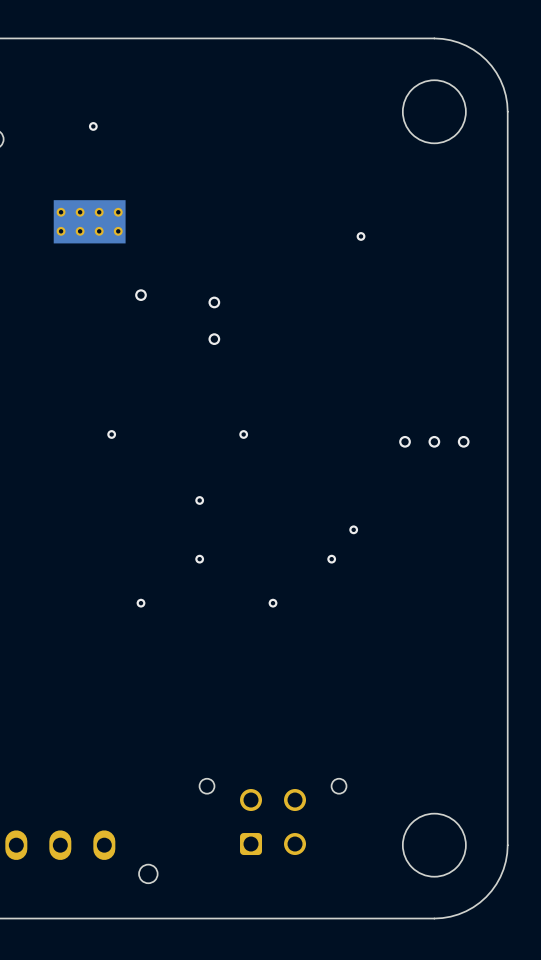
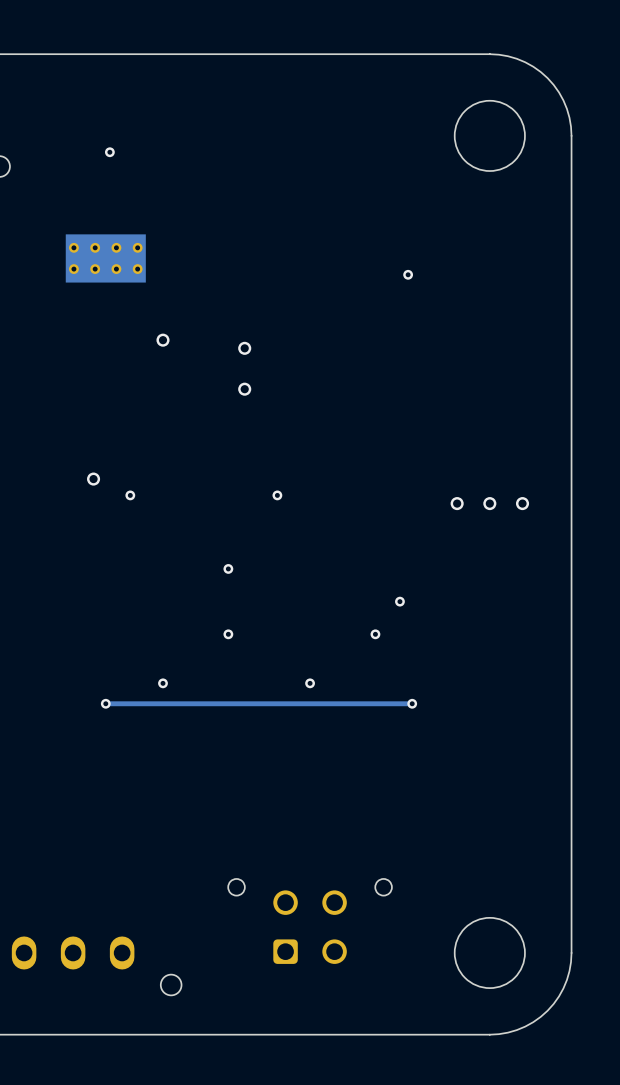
via: none -> (93, 479)
via: none -> (105, 703)
track: none -> (412, 703) (105, 703)
via: none -> (412, 703)

